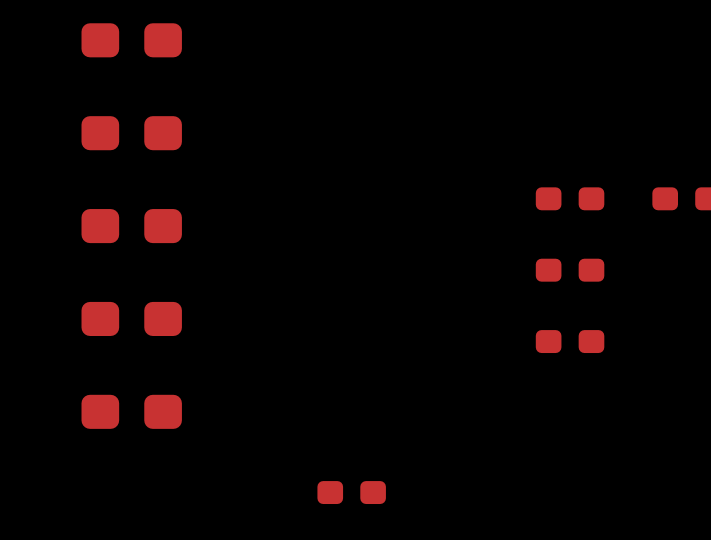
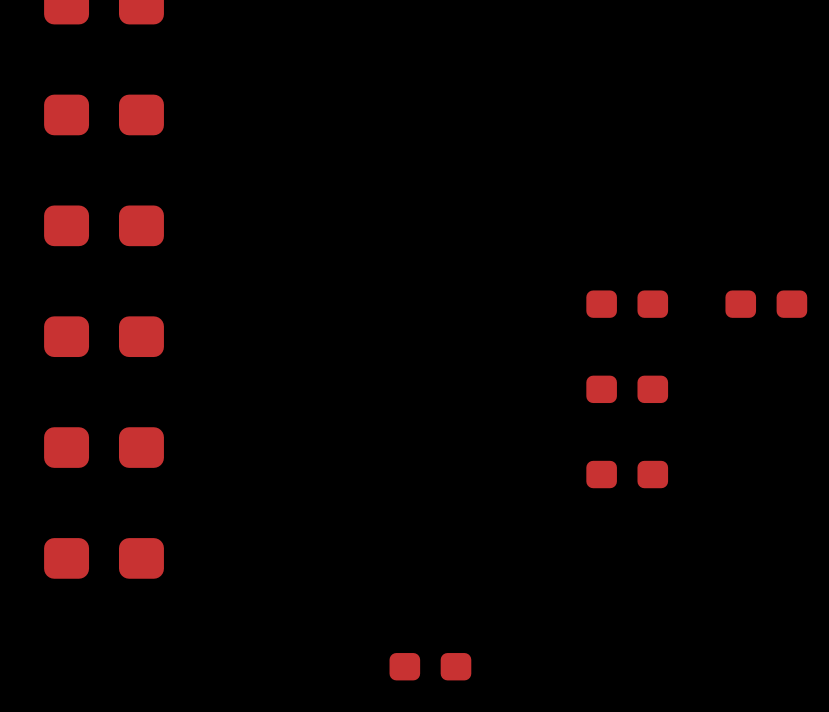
part position: (351, 492) -> (430, 666)

